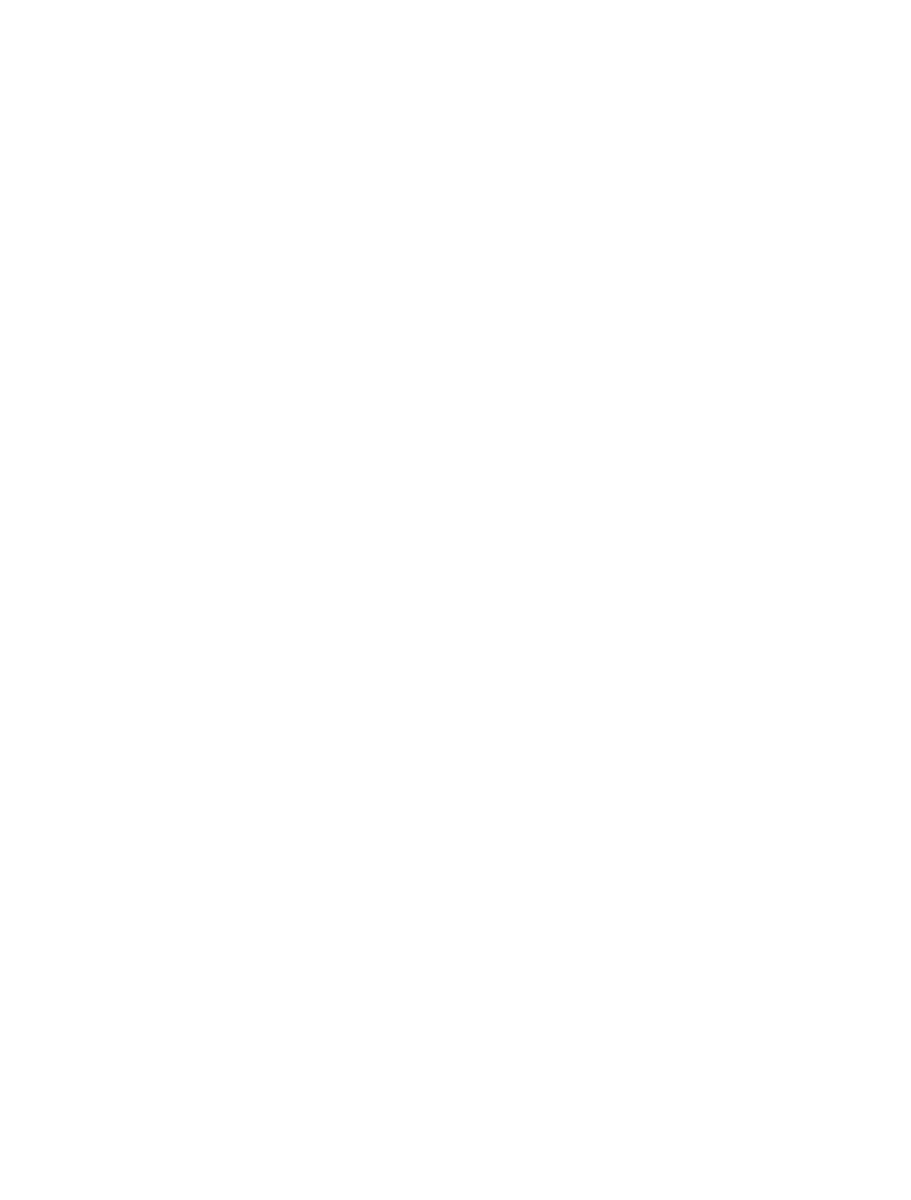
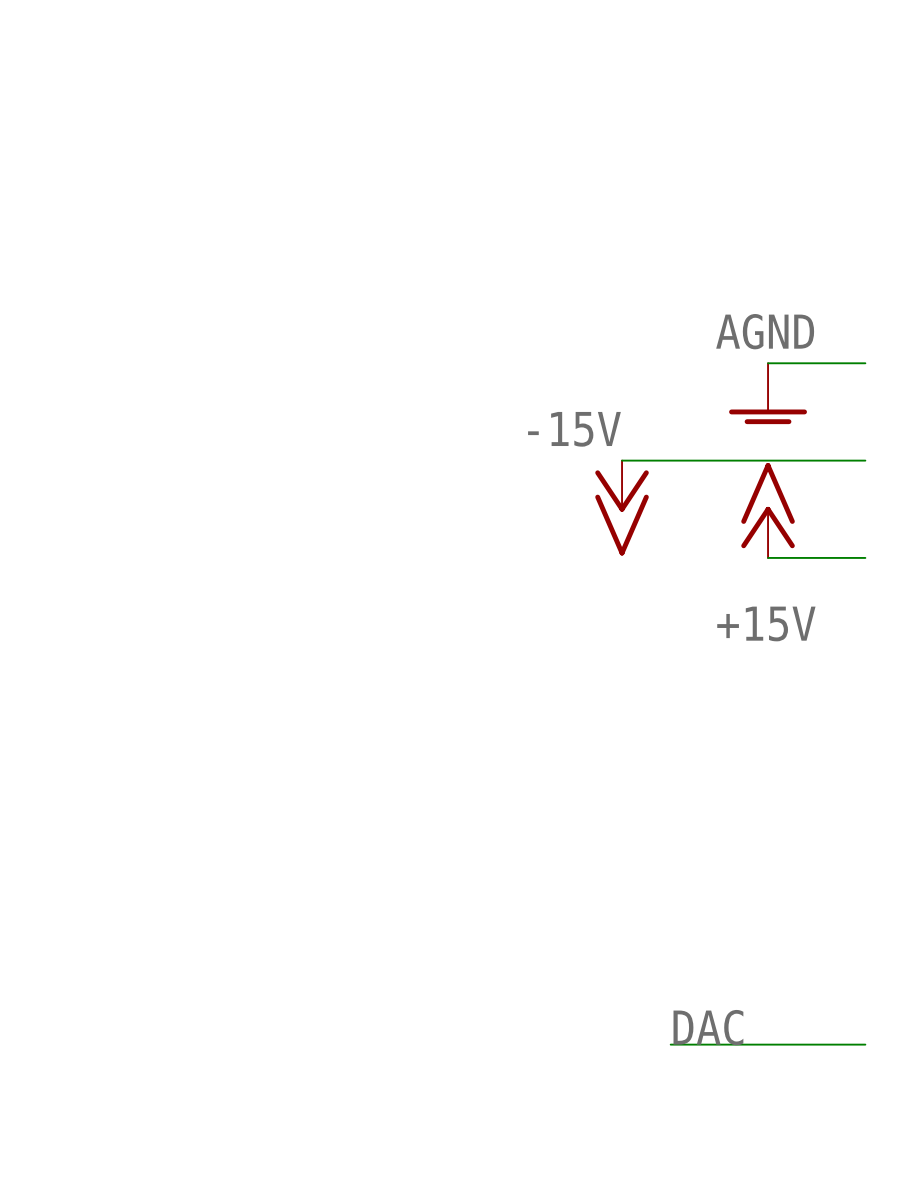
wire: none -> (768, 363) (865, 363)
power symbol: none -> AGND (768, 393)
wire: none -> (622, 460) (865, 460)
power symbol: none -> -15V (622, 508)
power symbol: none -> +15V (768, 510)
wire: none -> (768, 557) (865, 557)
label: none -> DAC (708, 1027)
wire: none -> (670, 1044) (865, 1044)

